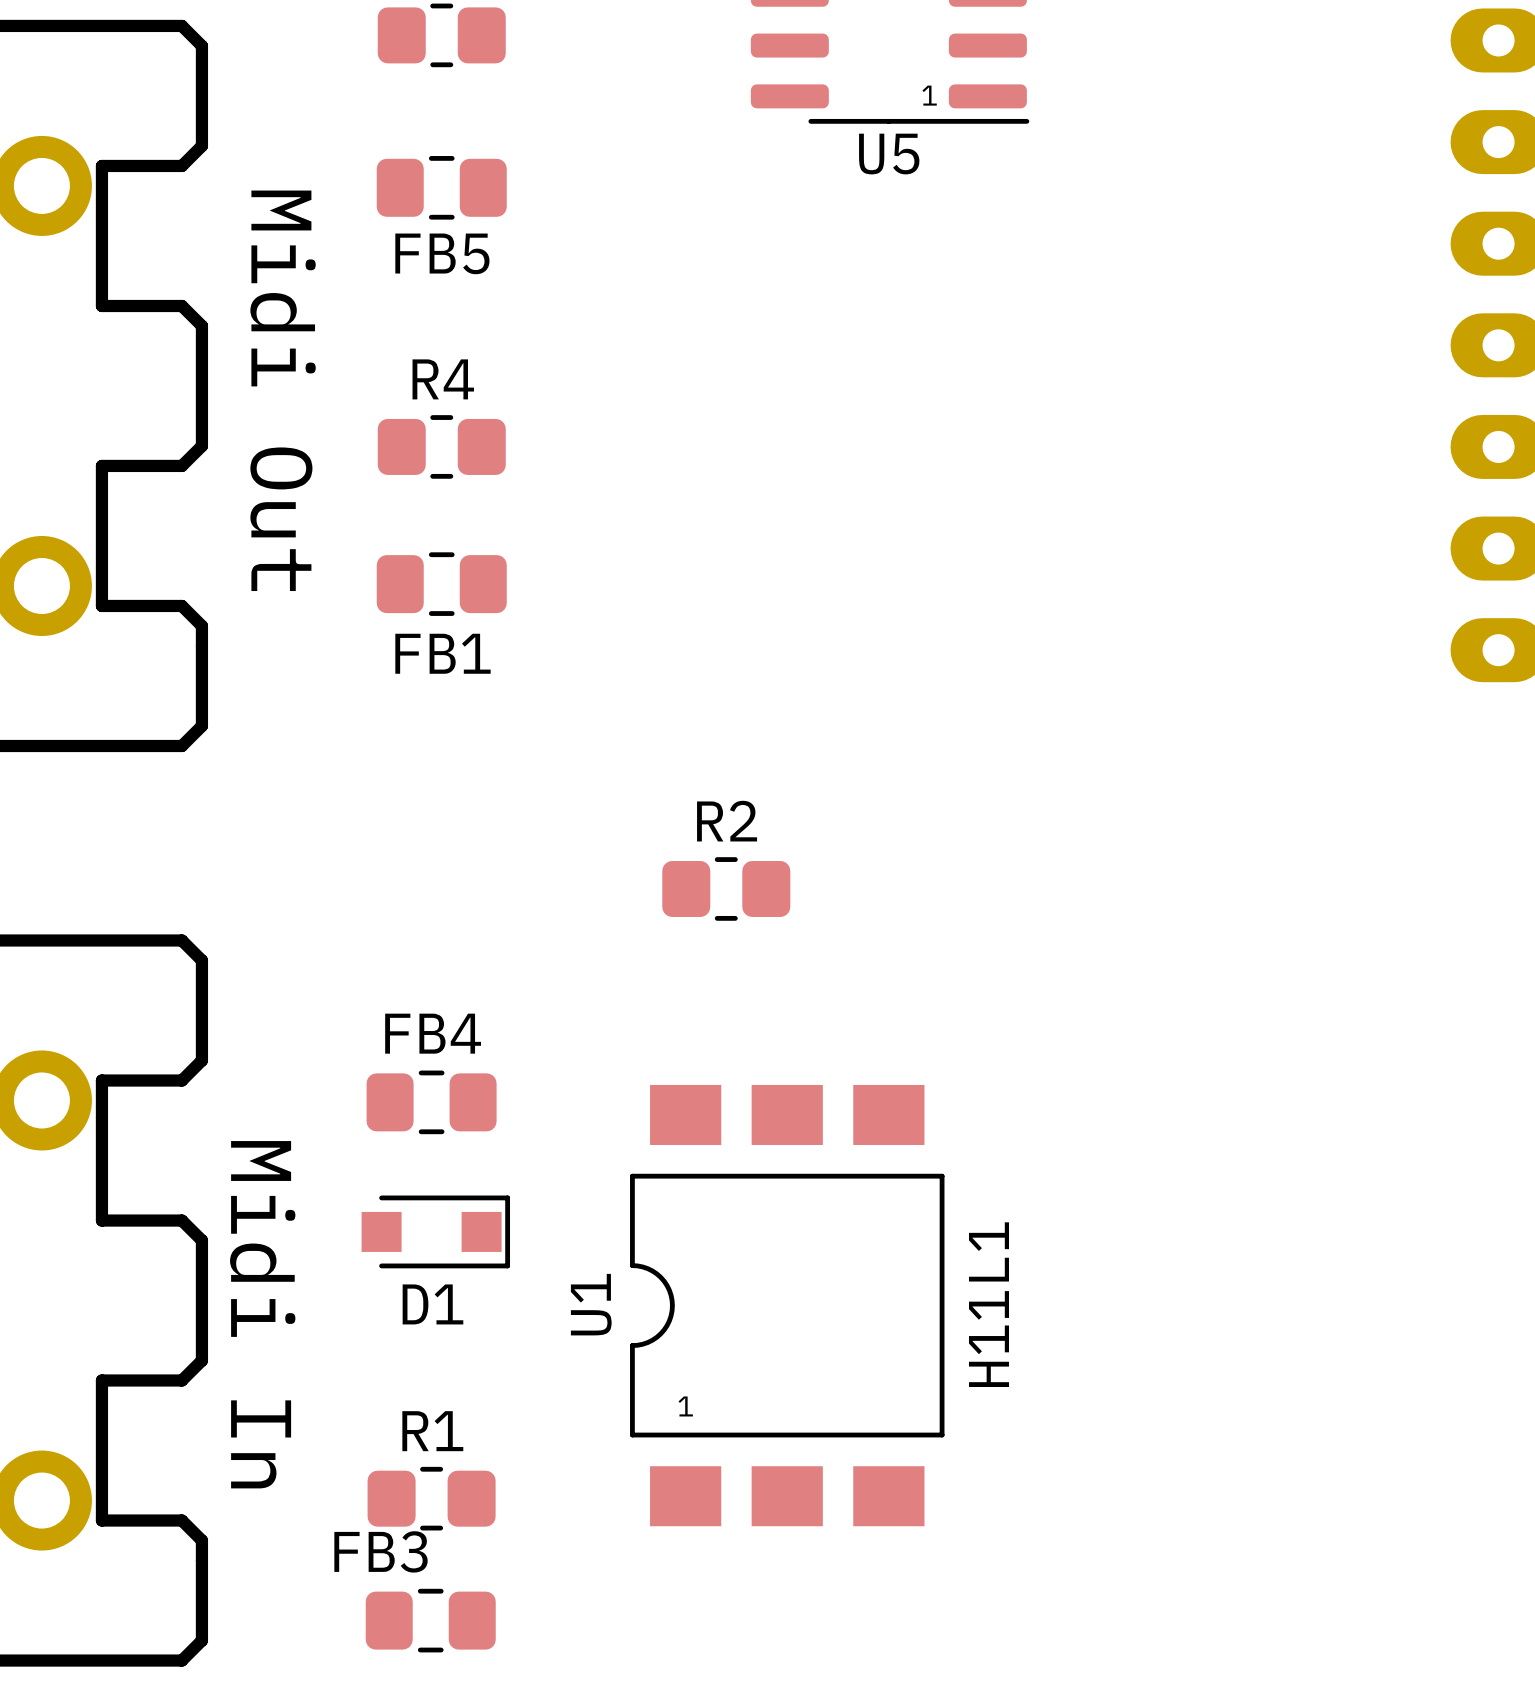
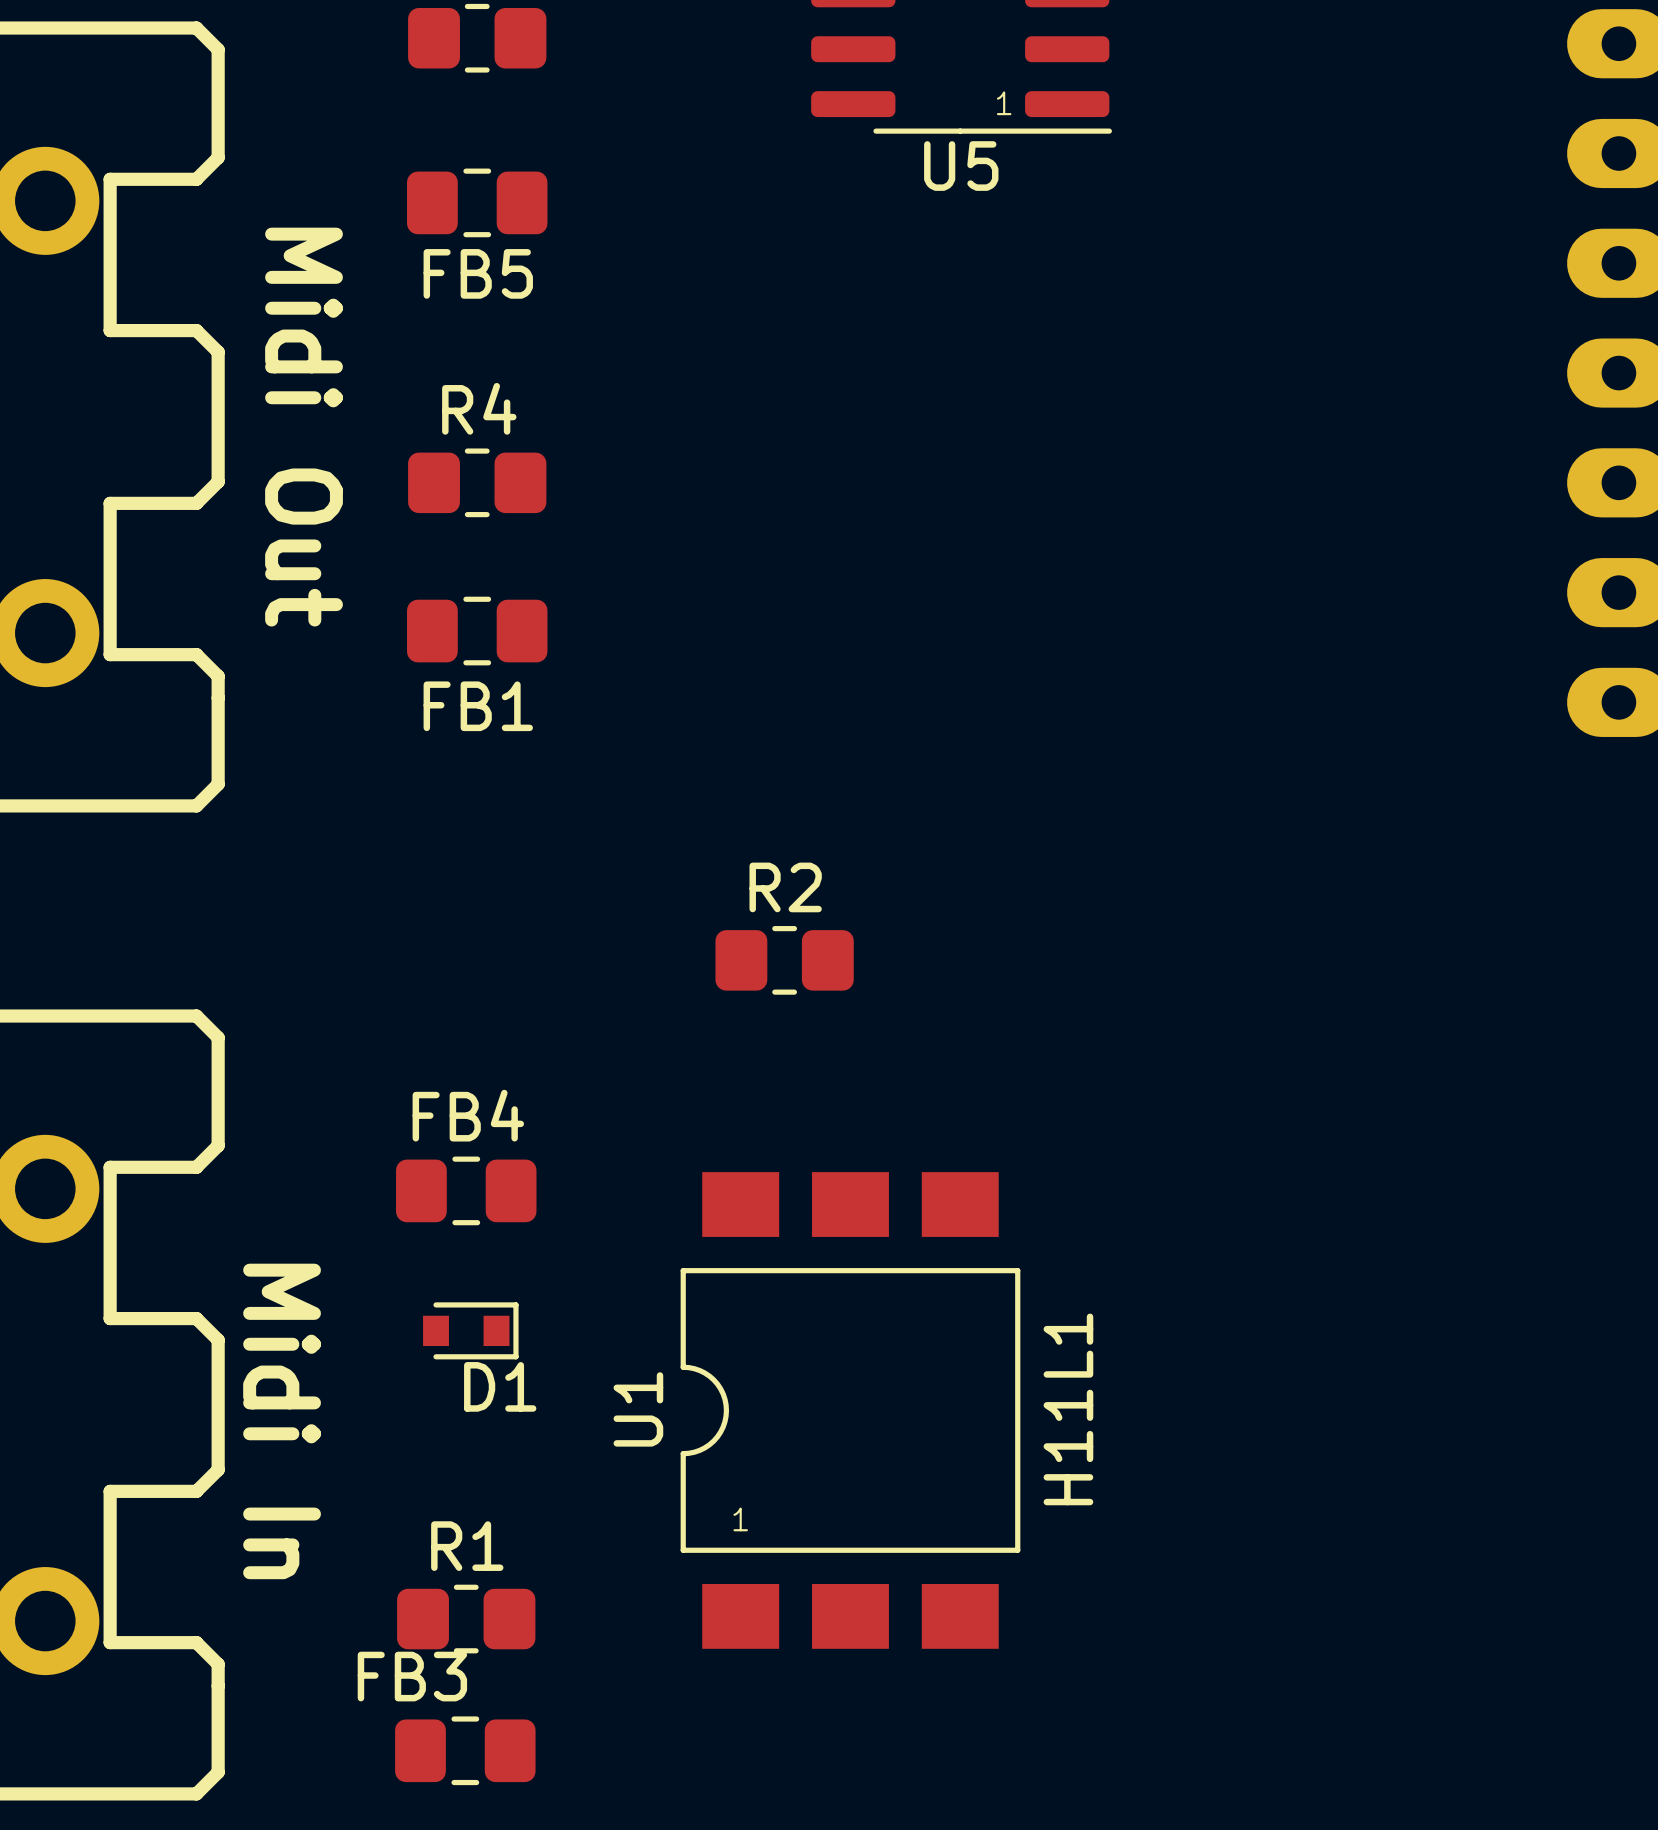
D1 footprint: [361, 1195, 511, 1269] -> [423, 1302, 519, 1360]
D1 name position: D1 (432, 1304) -> D1 (500, 1386)

